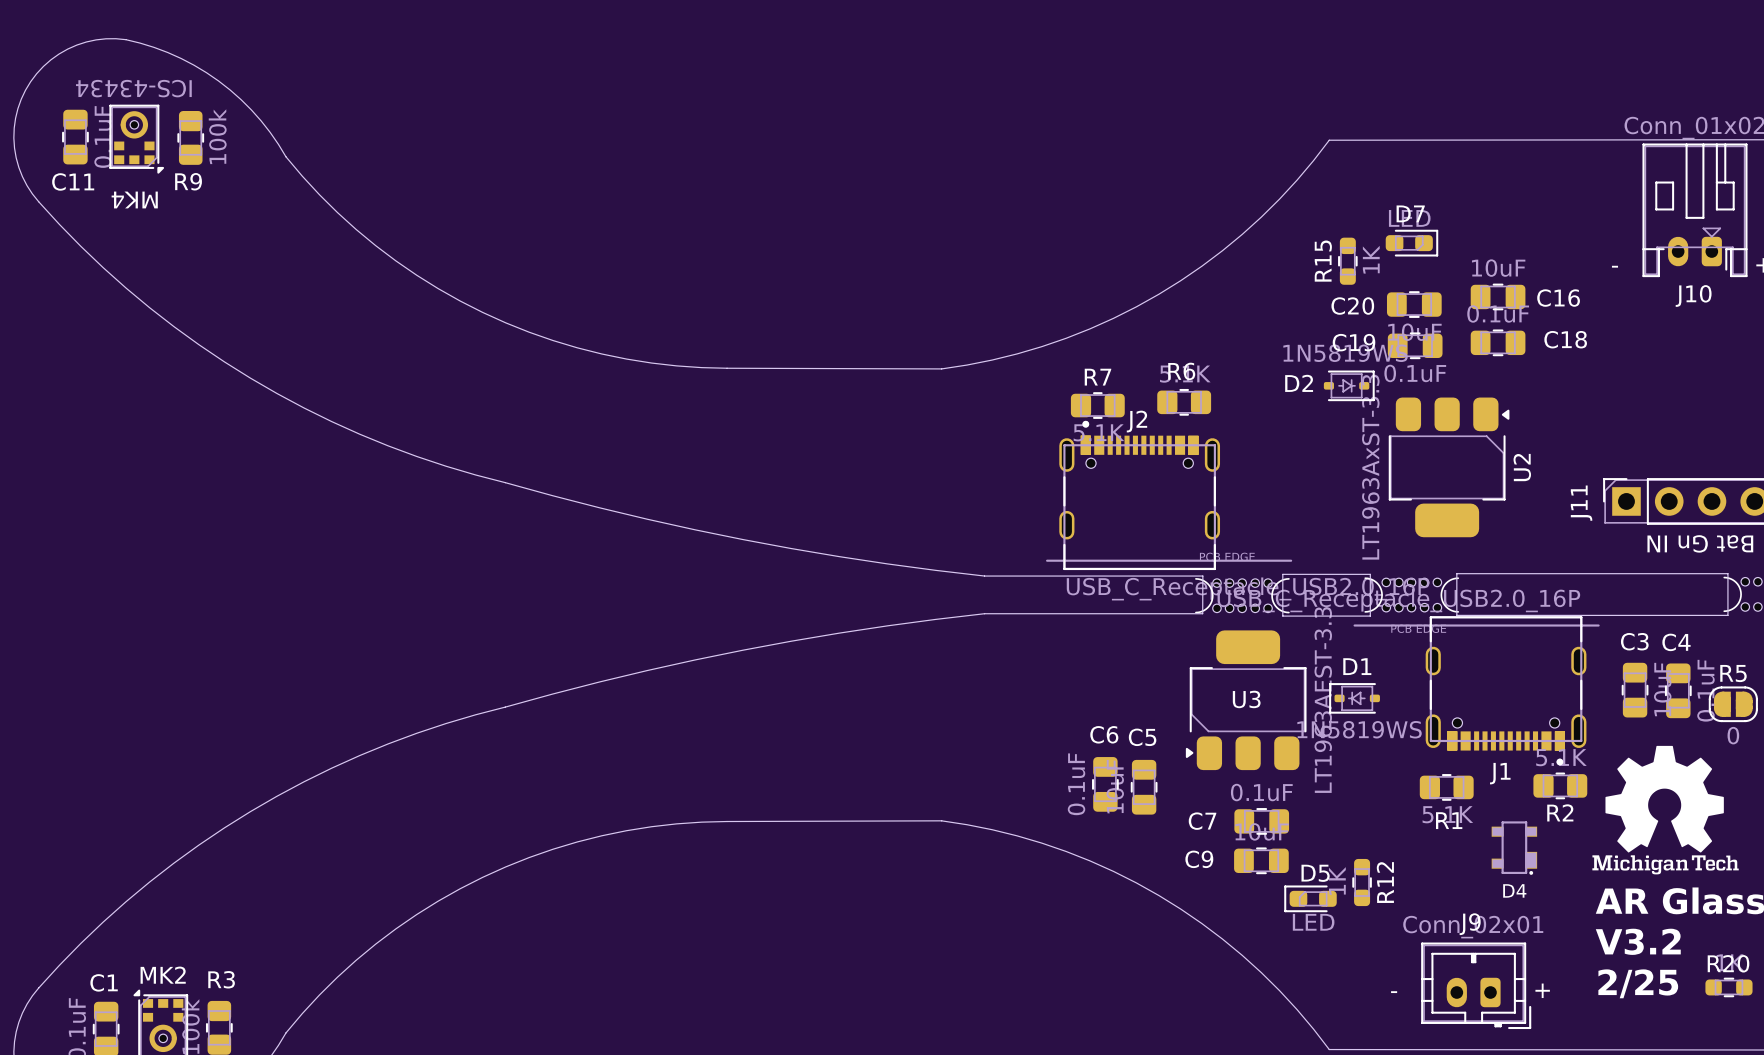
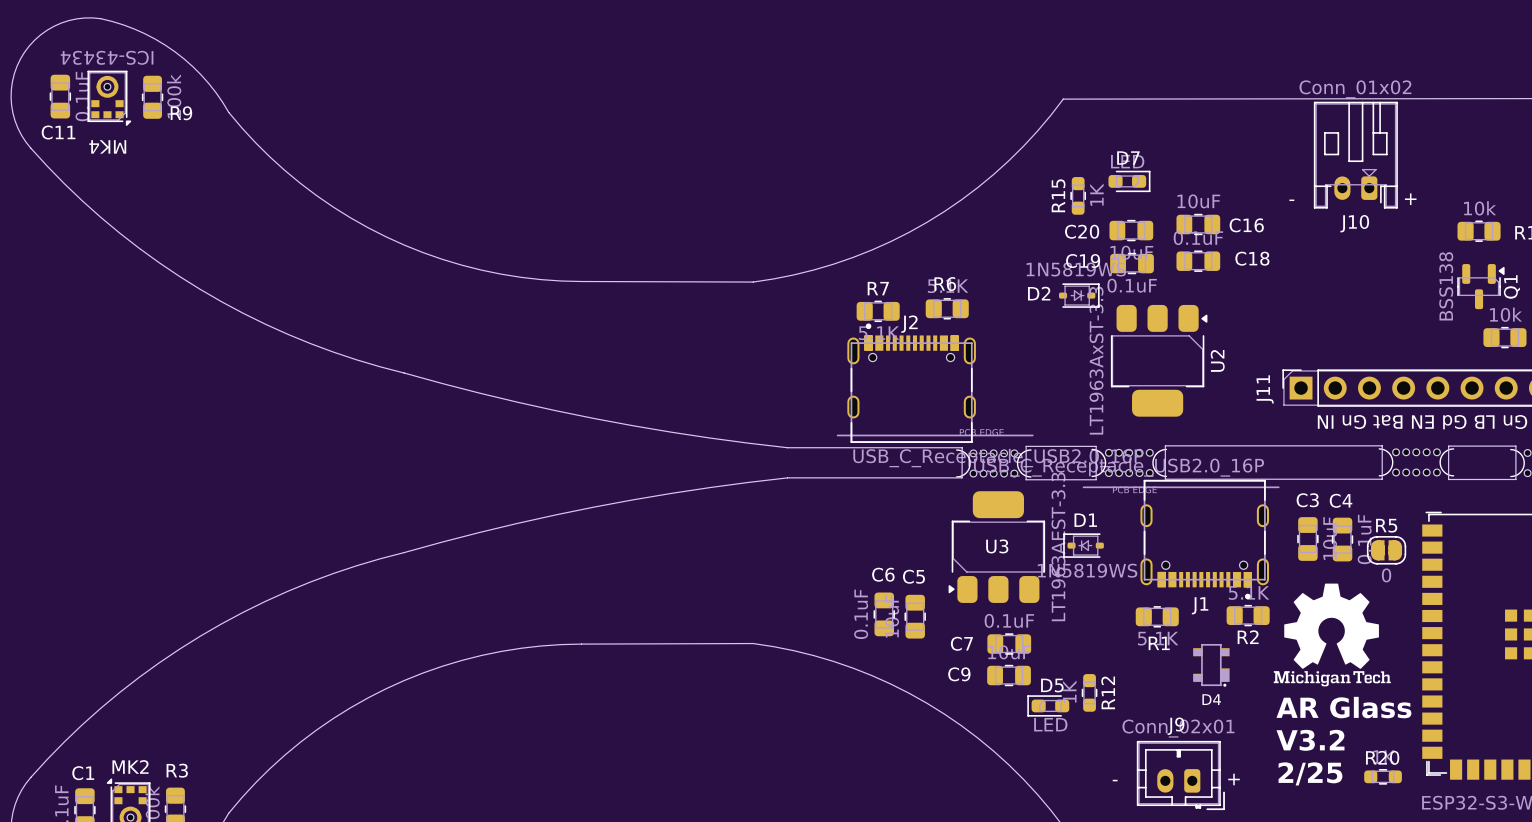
R9 name position: R9 (188, 181) -> R9 (181, 113)

